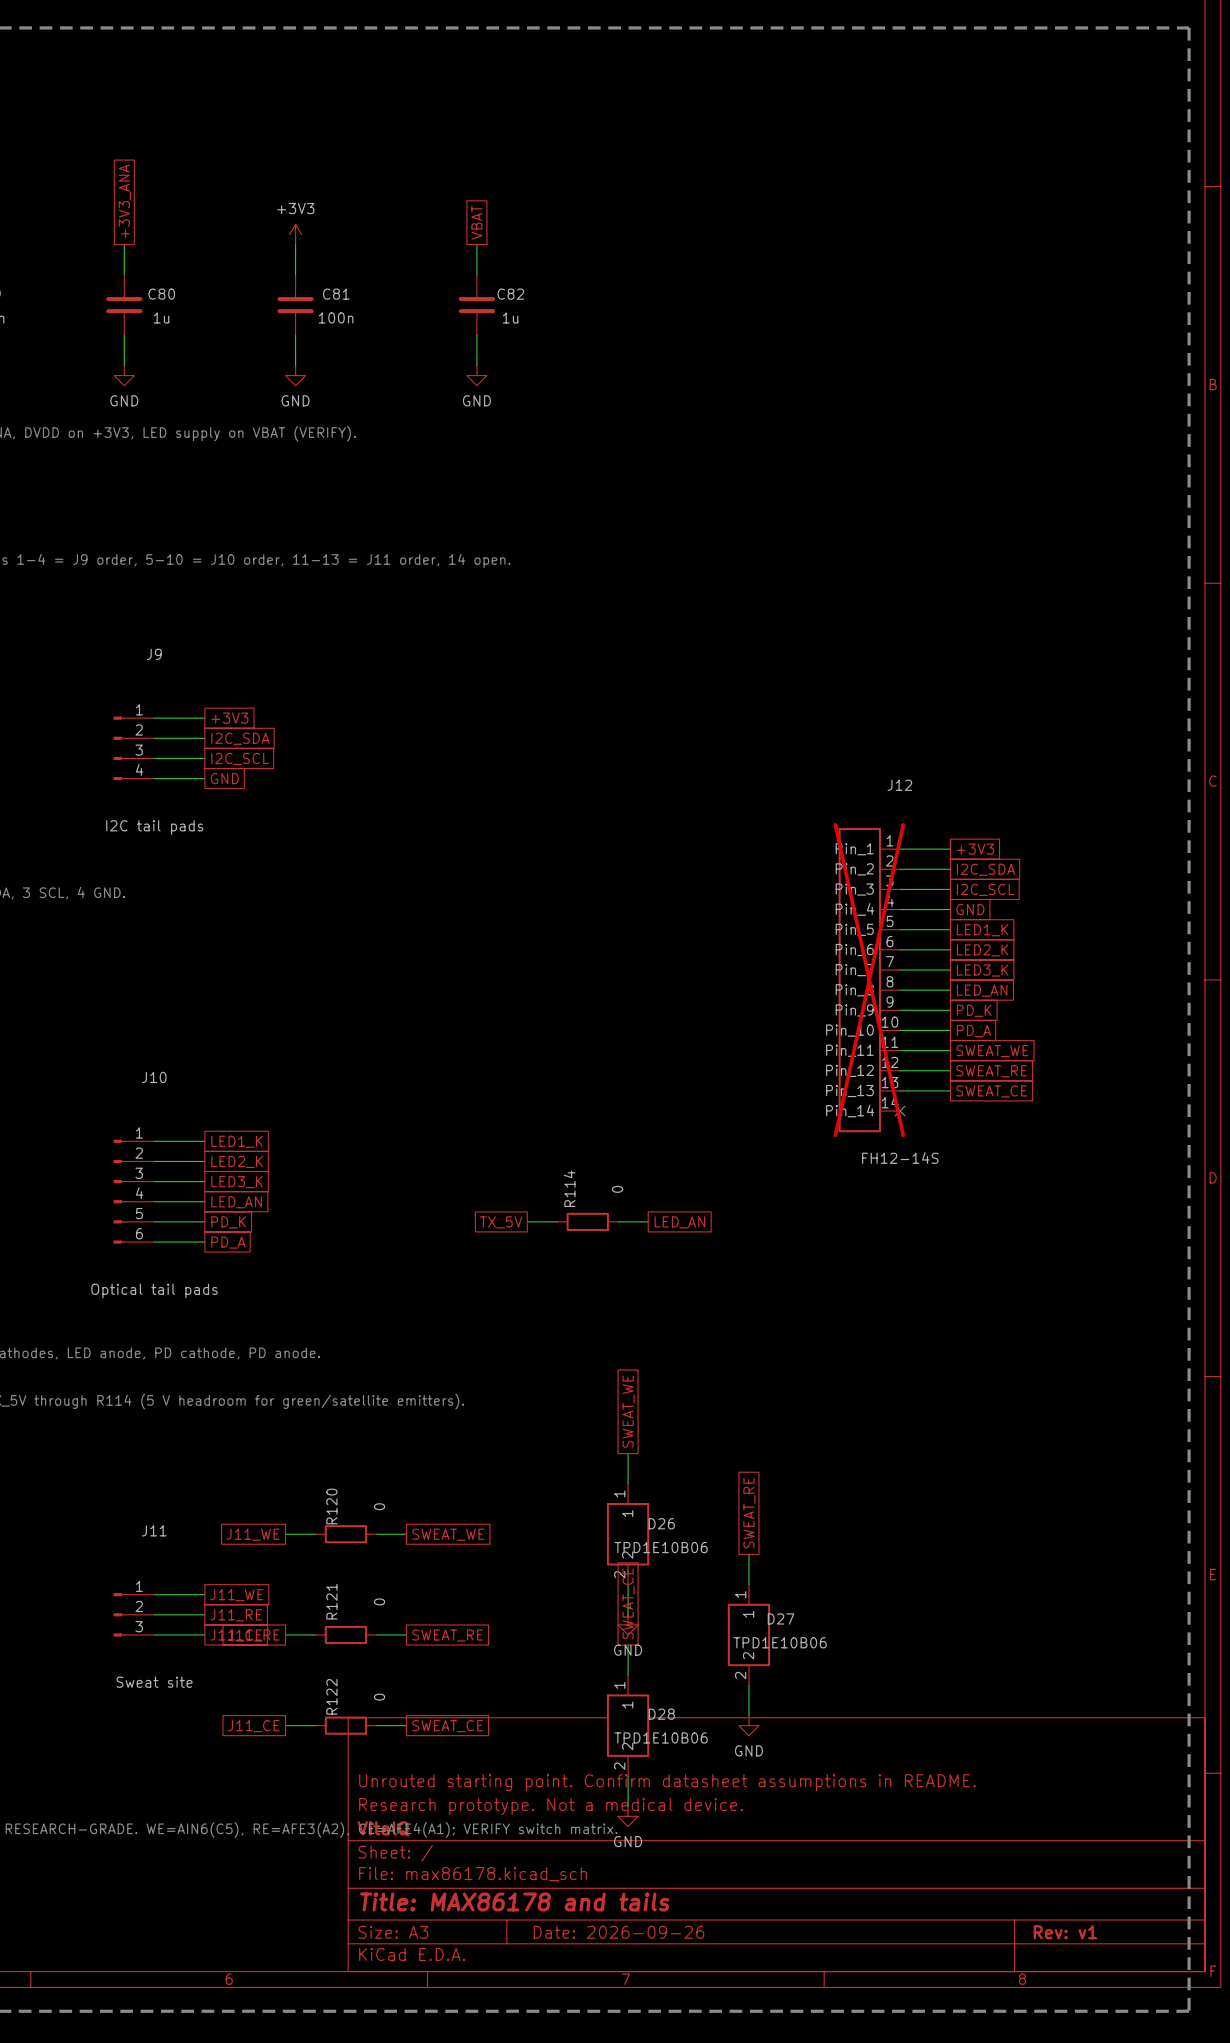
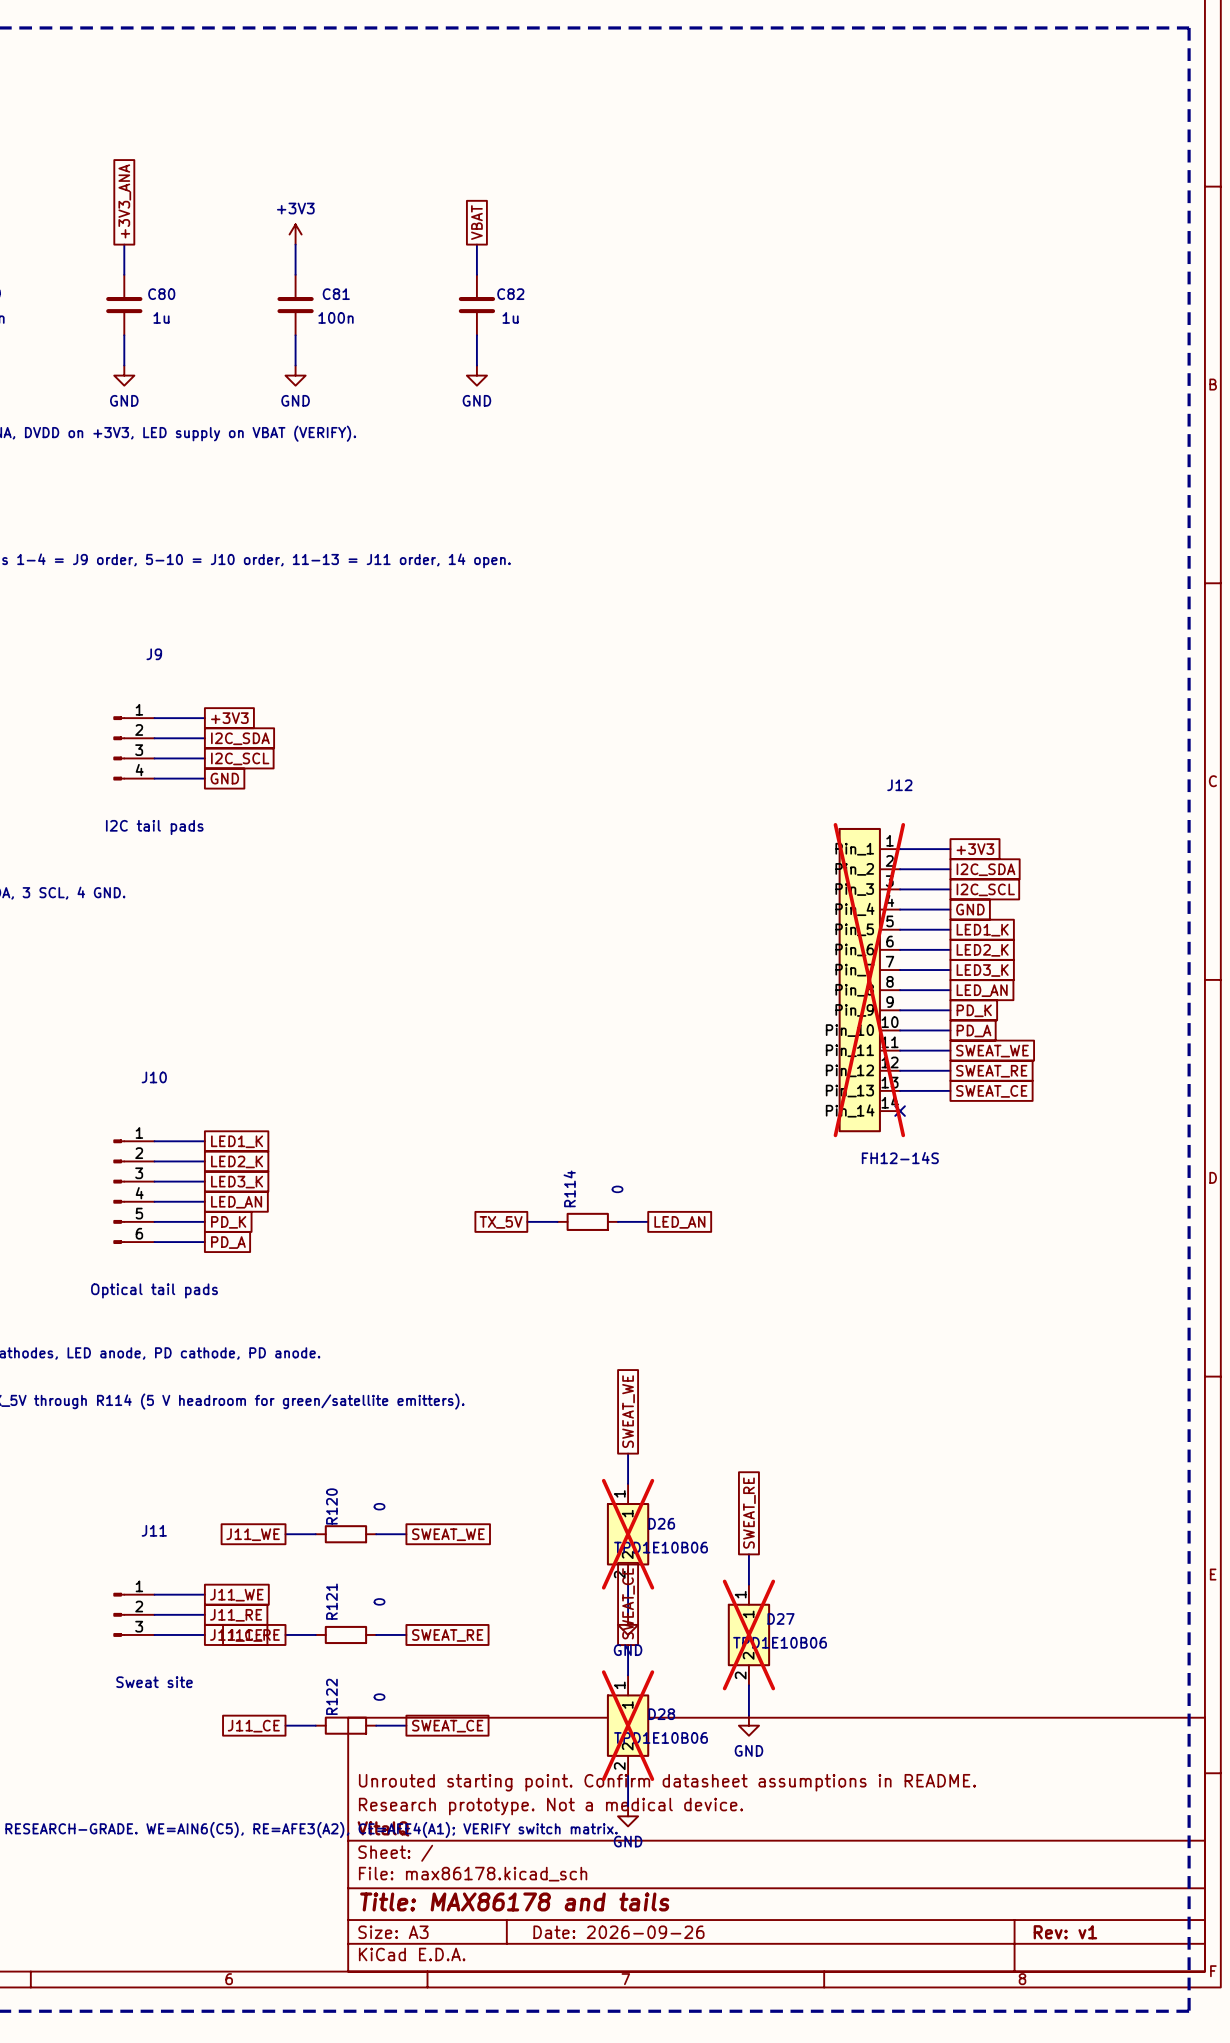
D26 do-not-place cross: none -> (628, 1534)
D27 do-not-place cross: none -> (748, 1634)
D28 do-not-place cross: none -> (628, 1725)

